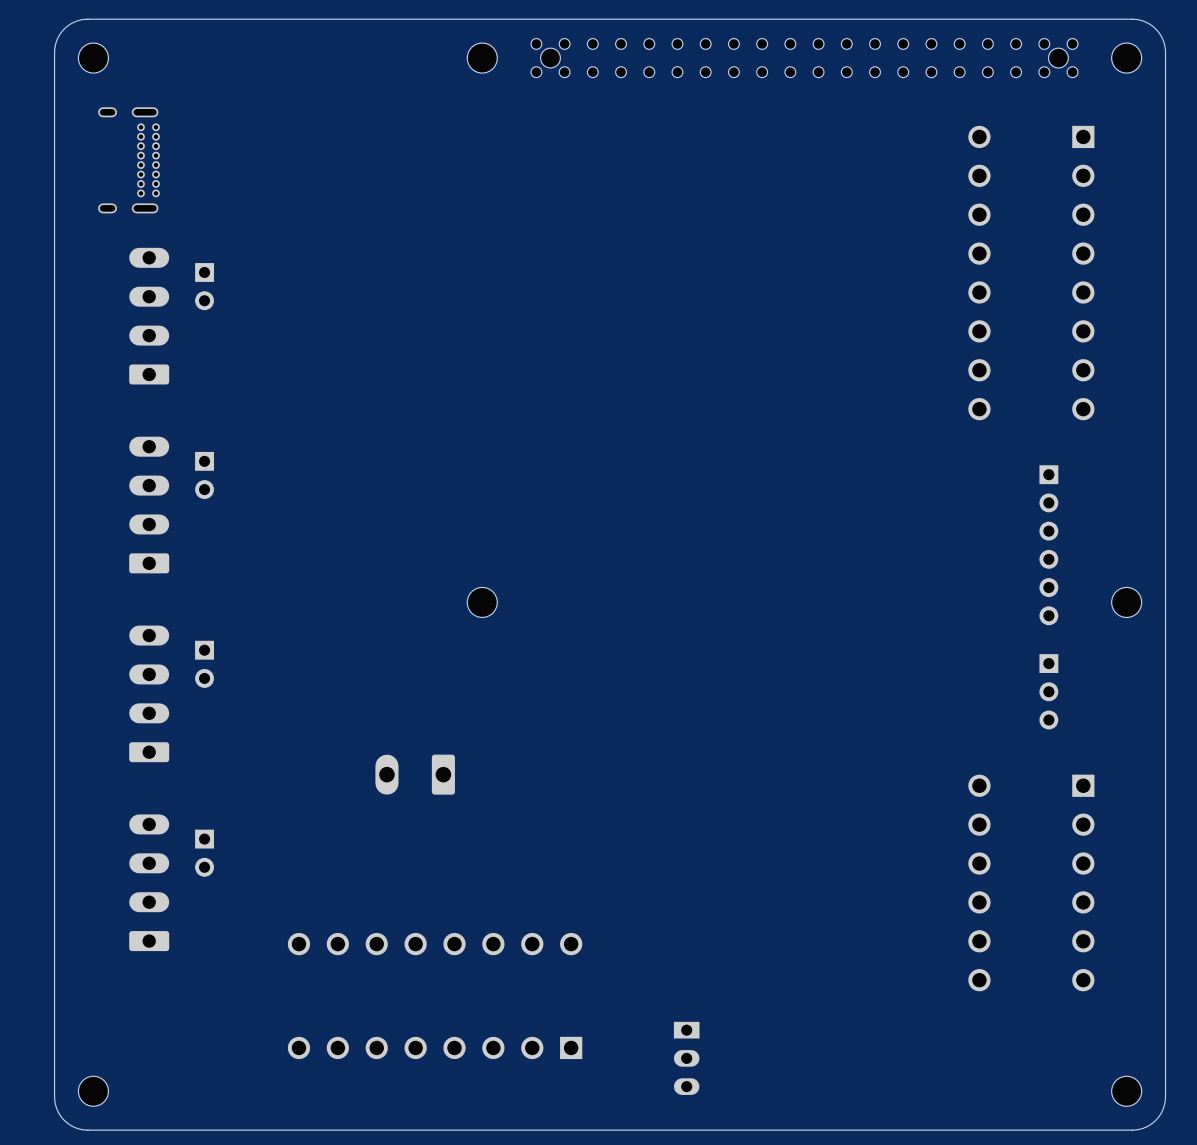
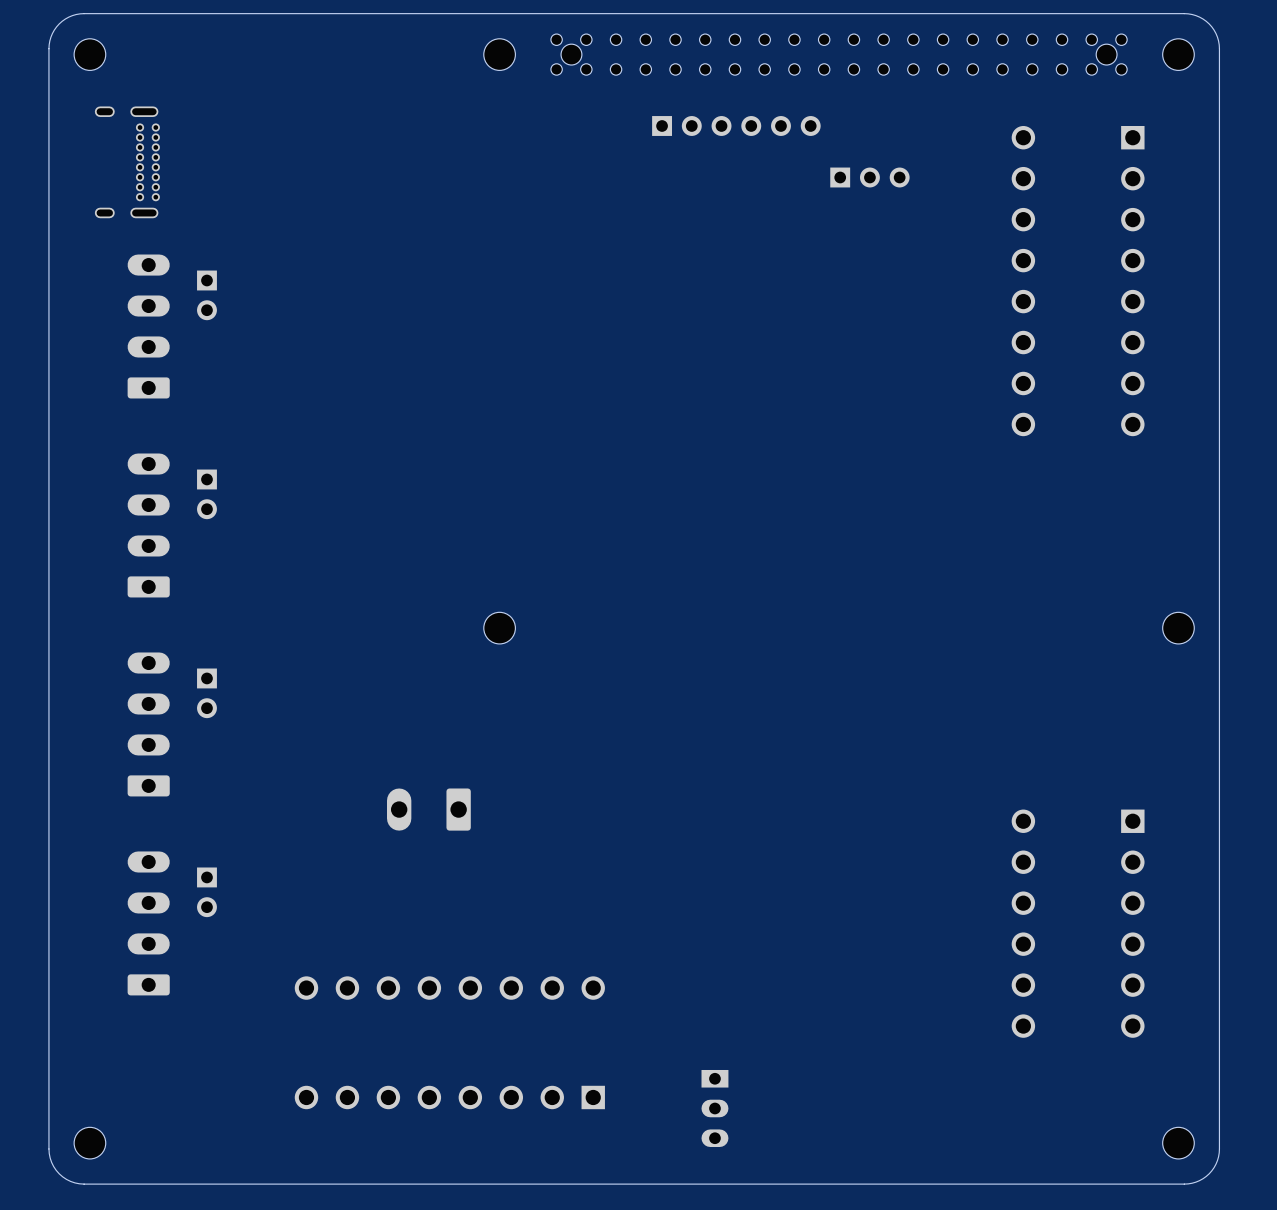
part: none -> (736, 125)
part: none -> (869, 177)
part: (1048, 545) -> none
part: (1048, 691) -> none

